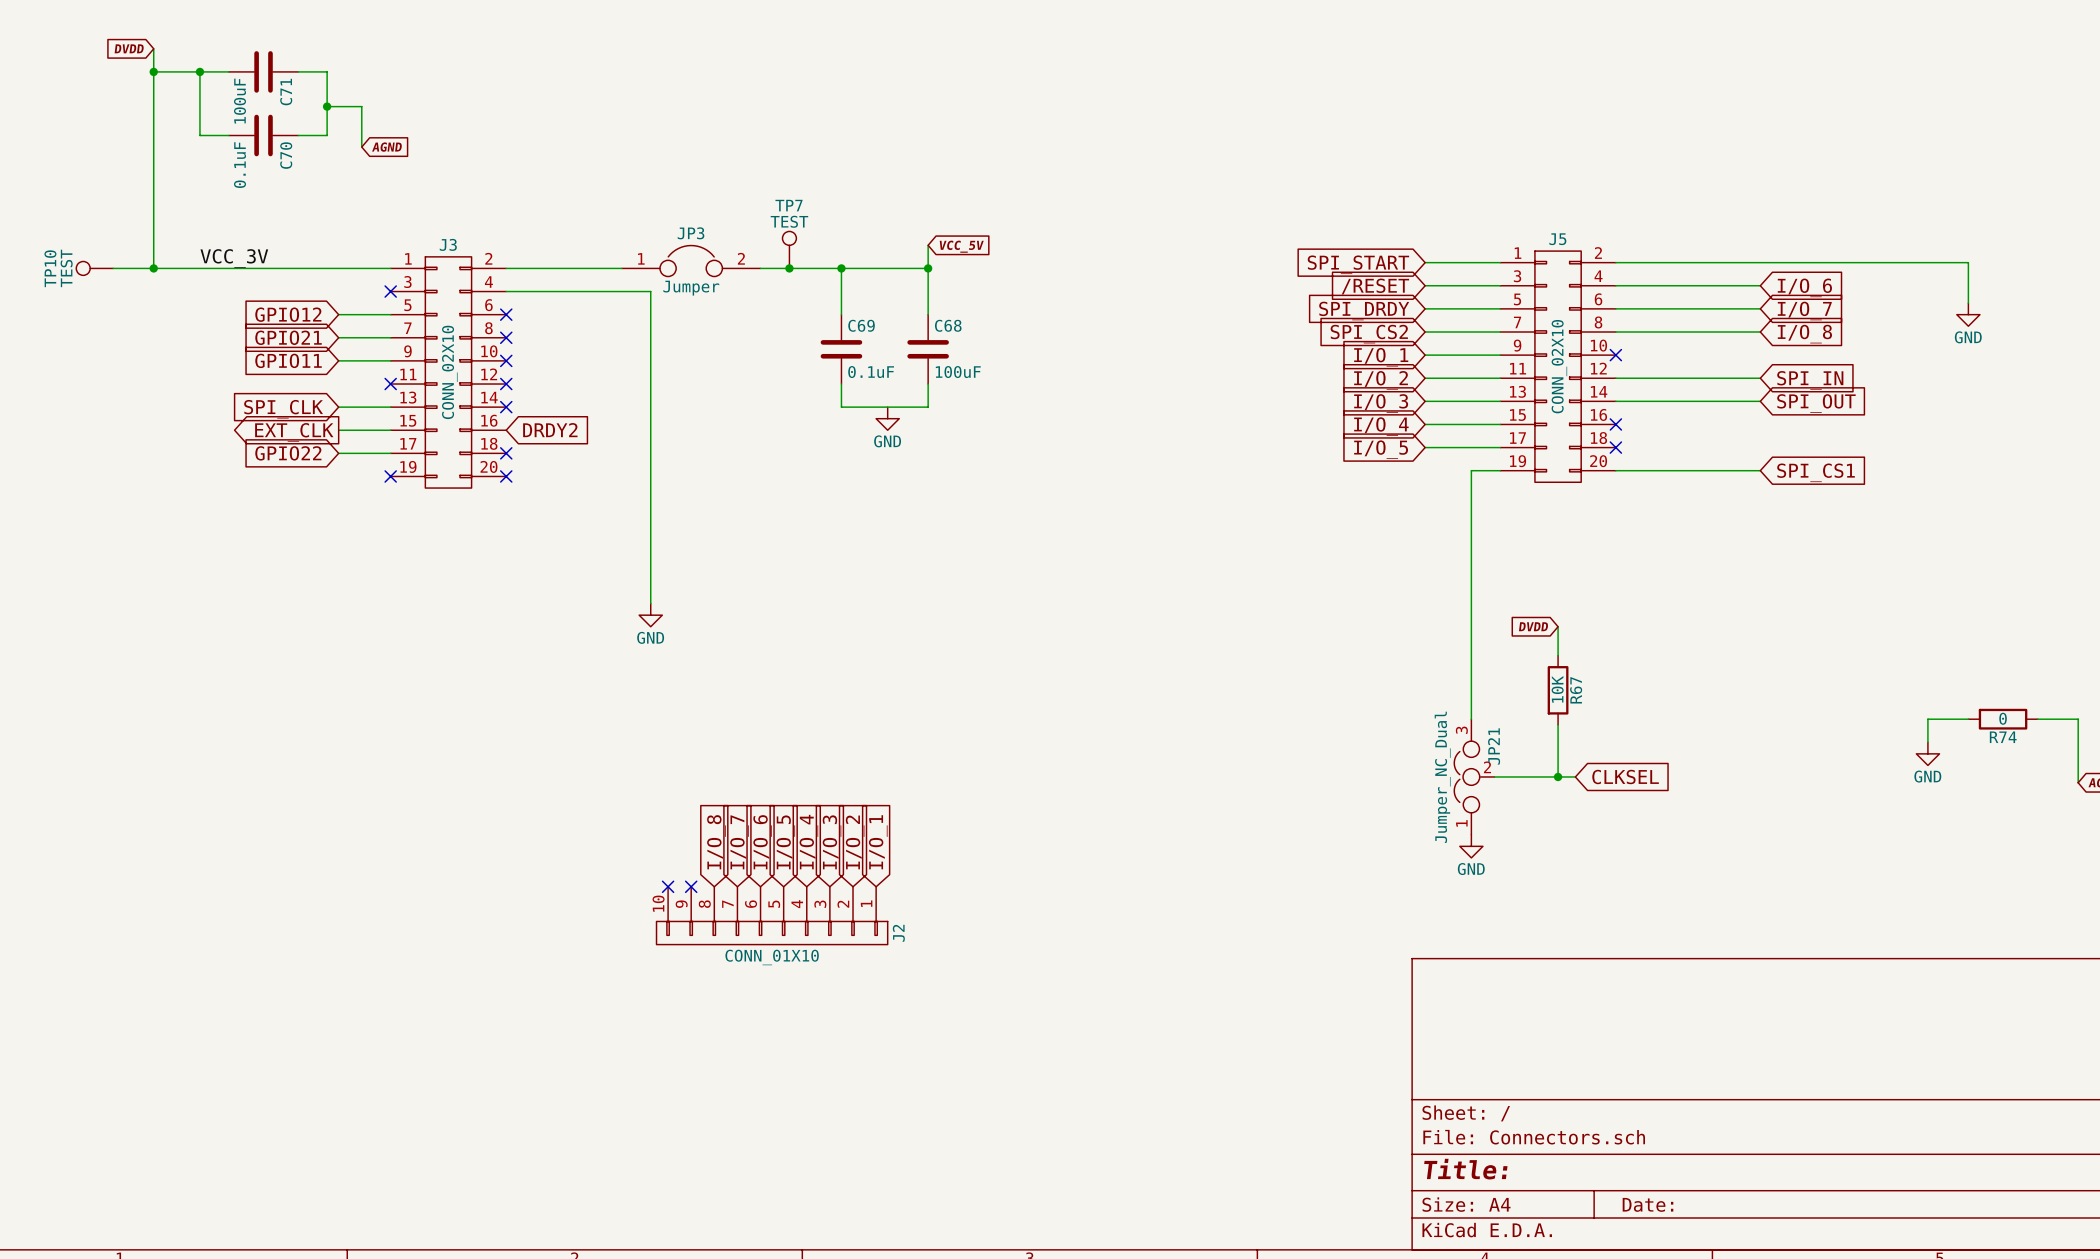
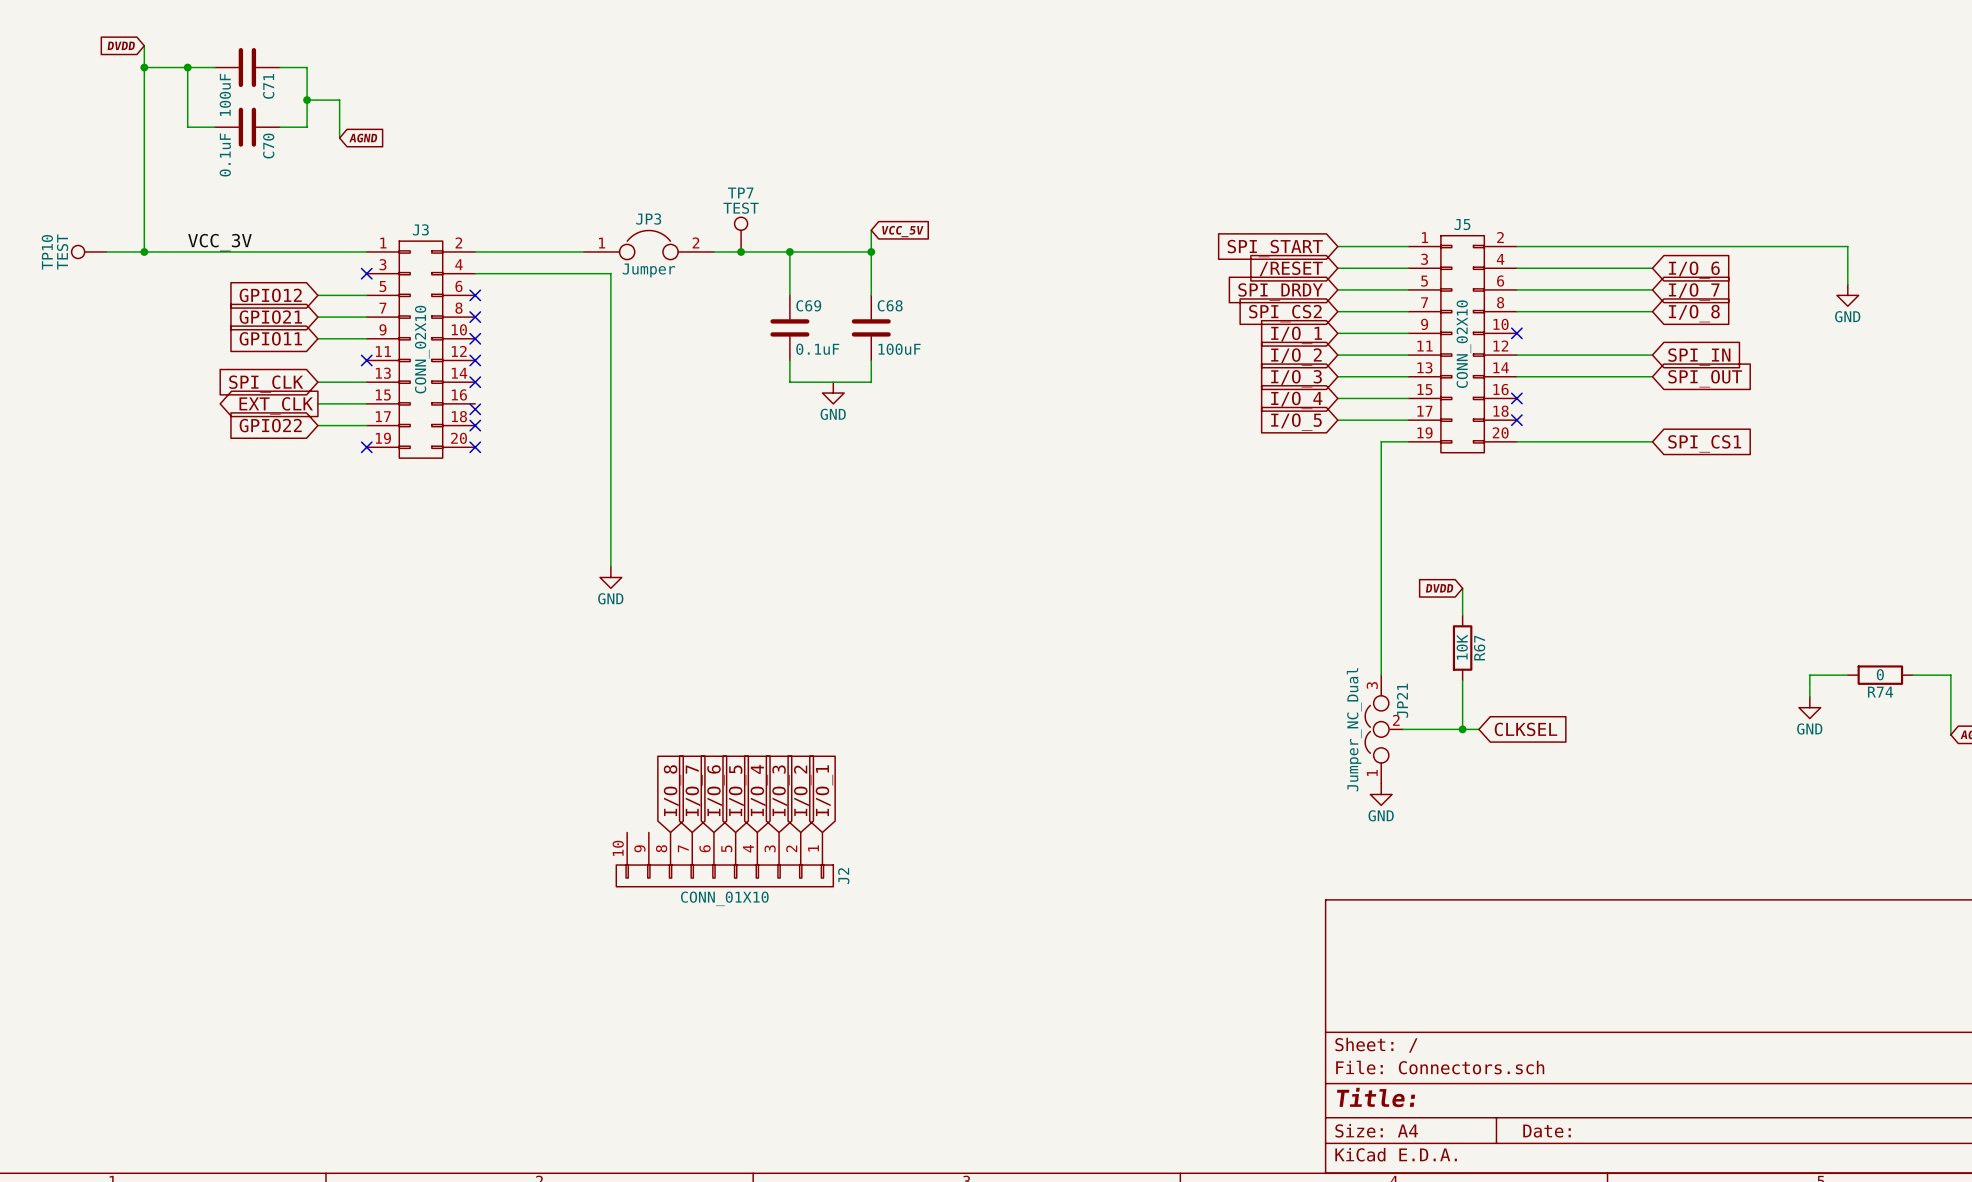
global label: DRDY2 (550, 430) -> none
no-connect mark: none -> (475, 409)
no-connect mark: (668, 886) -> none
no-connect mark: (691, 886) -> none

